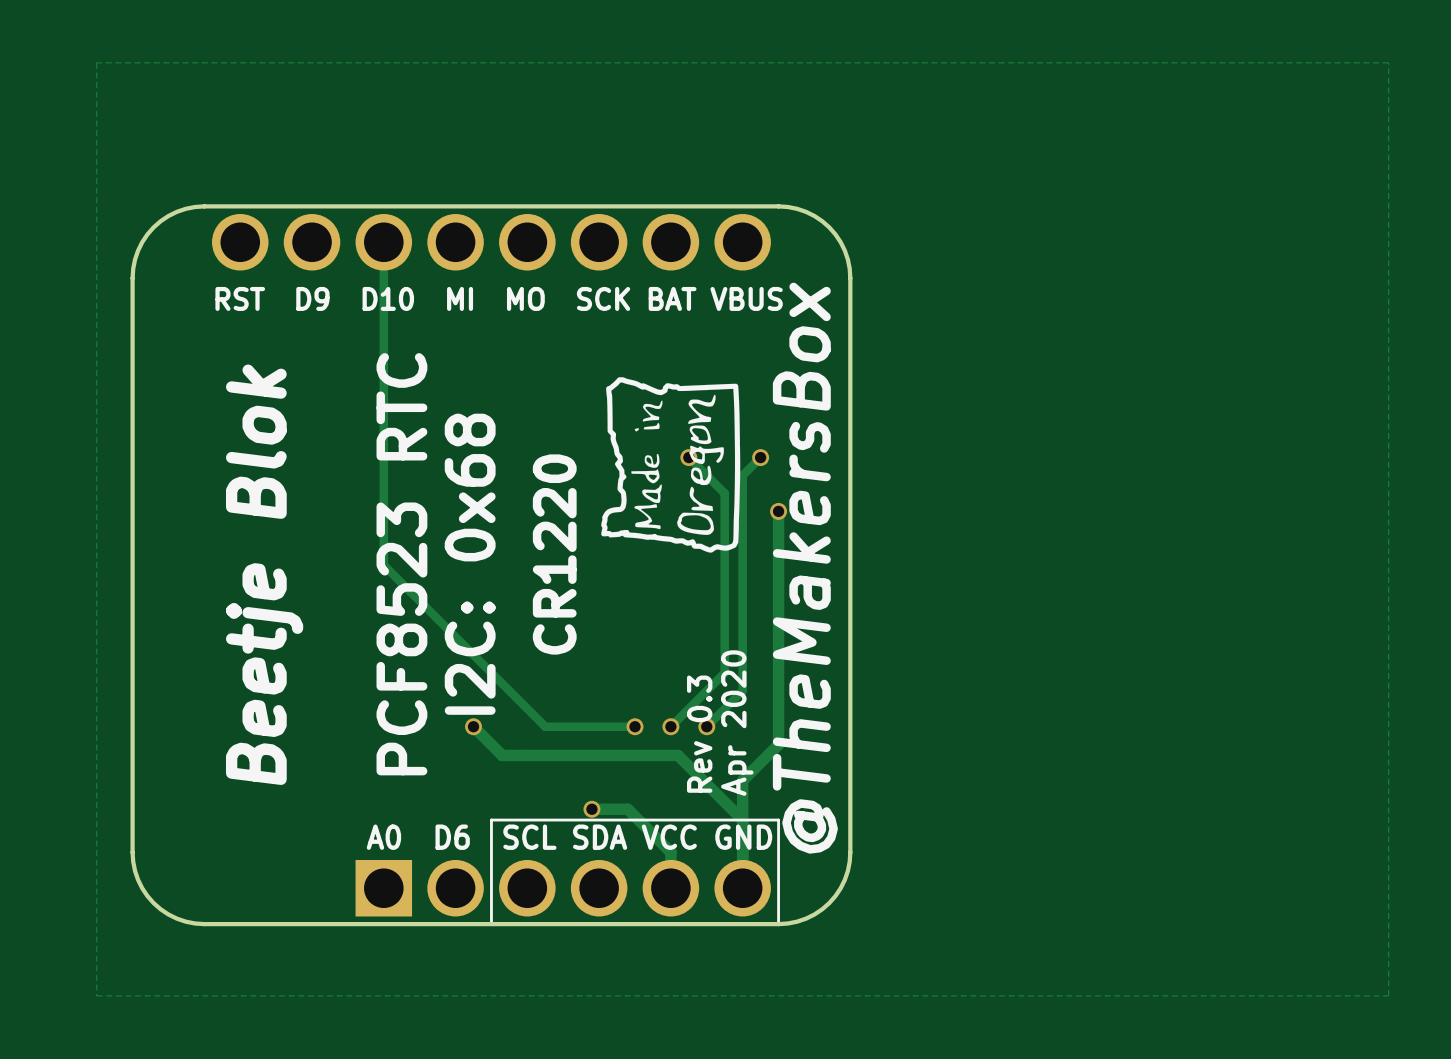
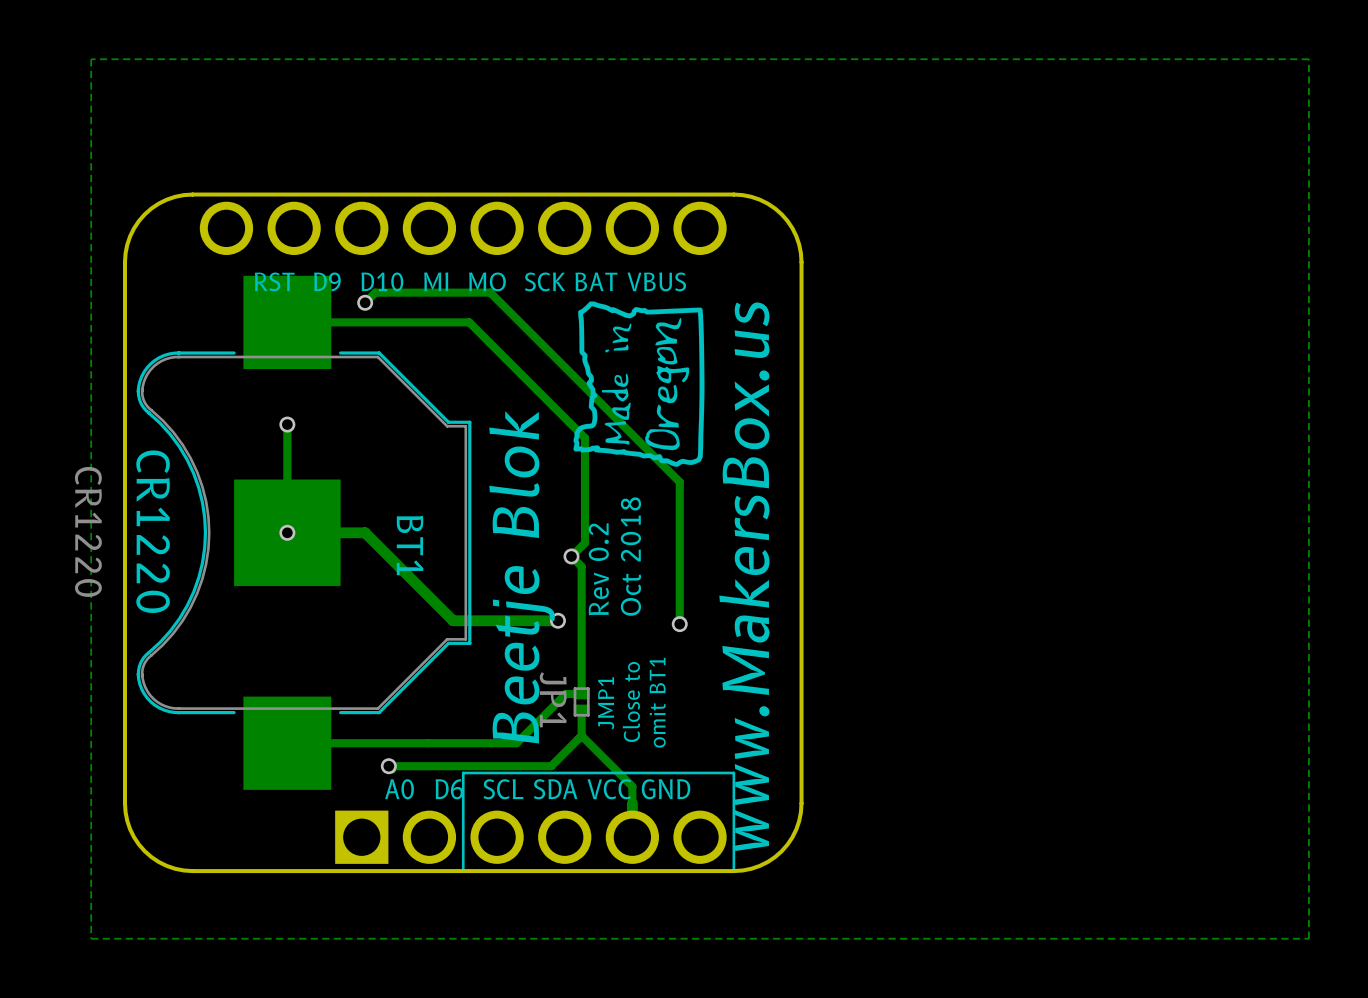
track: (383, 242) (383, 565) (545, 726) (635, 726) -> none
track: none -> (365, 302) (375, 292) (490, 292) (679, 482) (679, 624)
via: none -> (365, 302)
track: none -> (287, 322) (469, 322) (585, 438) (585, 542) (571, 556) (581, 566) (581, 693) (565, 693) (516, 743) (287, 743)
track: none -> (287, 424) (287, 532) (365, 532) (453, 620) (557, 620)
via: none -> (287, 424)
track: (688, 457) (724, 493) (724, 672) (670, 726) -> none
via: (688, 457) -> none
track: (760, 457) (742, 475) (742, 690) (706, 726) -> none
via: (760, 457) -> none
drawing position: (670, 464) -> (638, 384)
track: (778, 511) (778, 744) (742, 780) (742, 888) -> none
via: (778, 511) -> none
text rotation: 0° (554, 554) -> 180° (153, 531)
text position: CR1220 (554, 554) -> CR1220 (153, 531)
text: PCF8523 RTC (401, 564) -> none
text: I2C: 0x68 (470, 564) -> none
via: none -> (287, 532)
BT1: none -> CR1220 (304, 532)
text: @TheMakersBox (805, 568) -> www.MakersBox.us (744, 576)
text position: Beetje Blok (264, 574) -> Beetje Blok (522, 577)
text: none -> Oct 2018 (630, 556)
via: none -> (571, 556)
text: none -> Rev 0.2 (598, 569)
via: none -> (557, 620)
via: none -> (679, 624)
text: Apr 2020 (737, 723) -> none
track: (473, 726) (502, 755) (678, 755) (742, 820) -> none
via: (473, 726) -> none
via: (635, 726) -> none
via: (670, 726) -> none
via: (706, 726) -> none
text: Rev 0.3 (699, 734) -> none
JP1: none -> (581, 701)
text: none -> Close to (631, 701)
text: none -> omit BT1 (657, 702)
text: none -> JMP1 (606, 703)
track: none -> (581, 709) (581, 735)
track: none -> (581, 735) (551, 766) (388, 766) (392, 769)
track: (591, 809) (627, 809) (670, 852) -> (581, 735) (632, 786) (632, 803)
via: (591, 809) -> none
via: none -> (388, 766)

